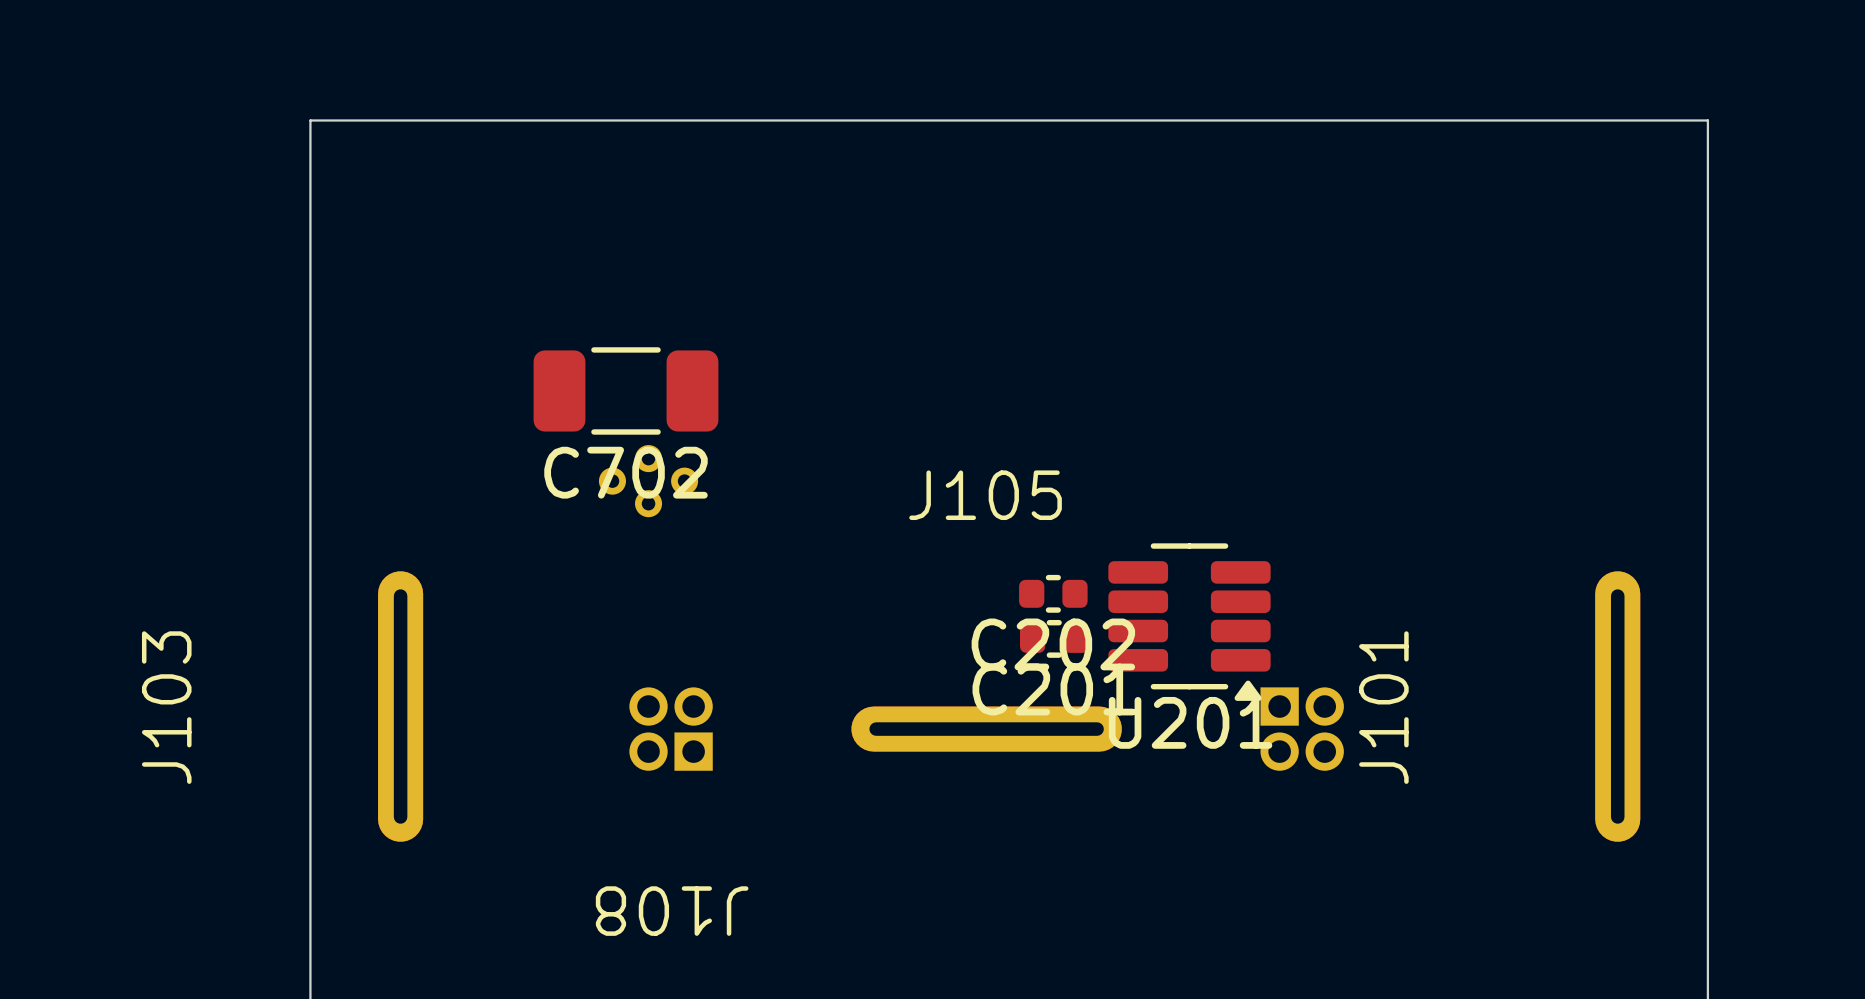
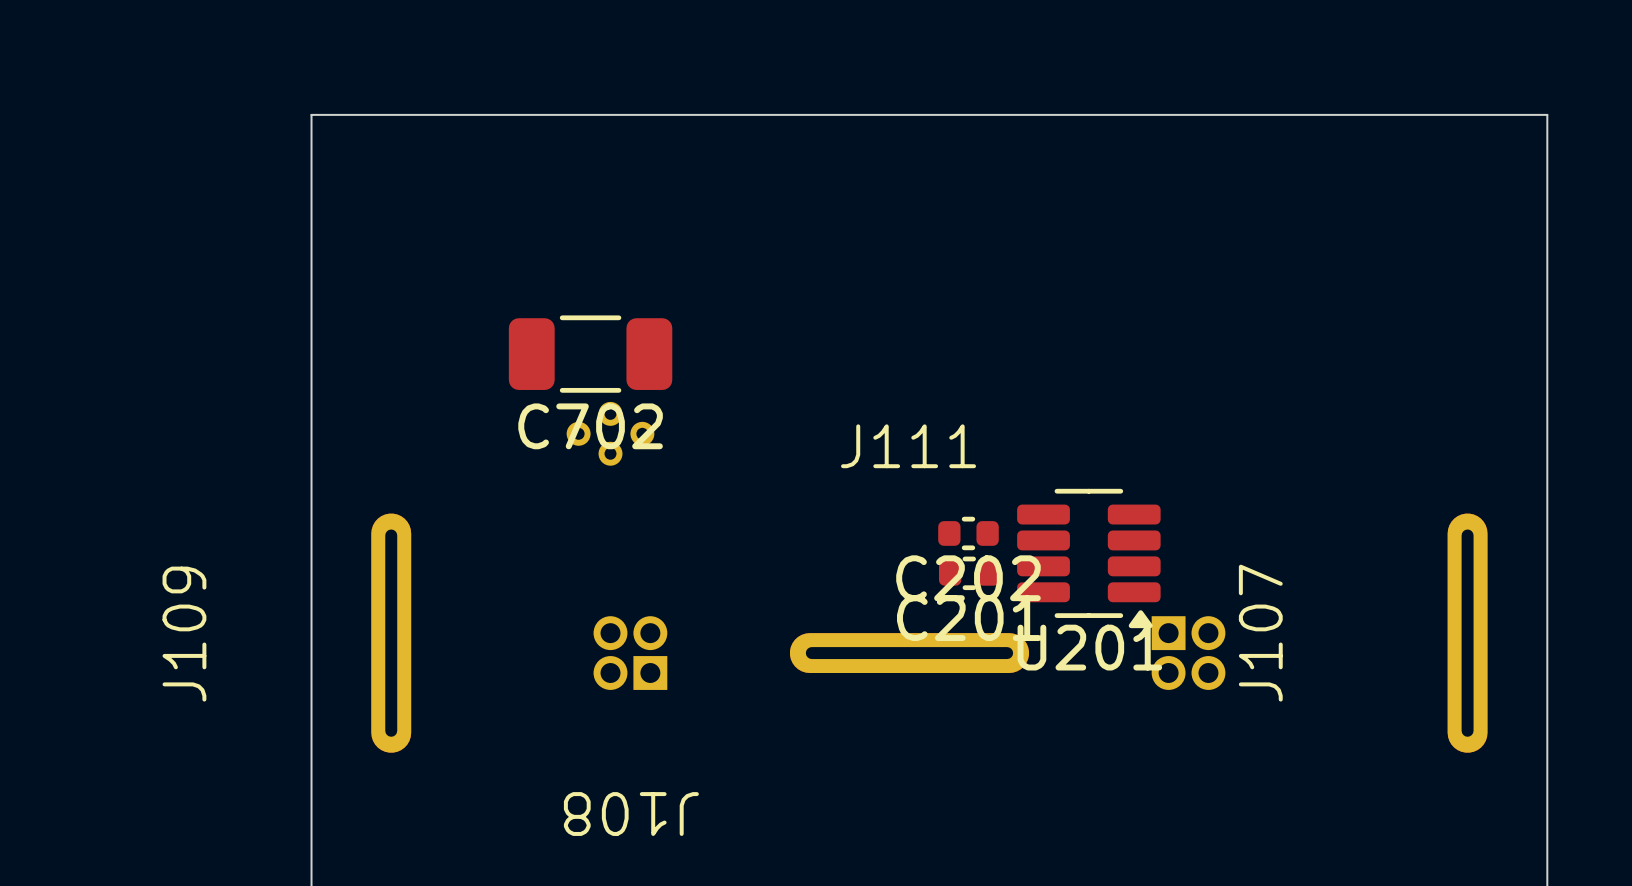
J105 name: J105 (985, 495) -> J111 (908, 446)
J103 name: J103 (166, 707) -> J109 (184, 634)
J101 name: J101 (1383, 707) -> J107 (1260, 633)

